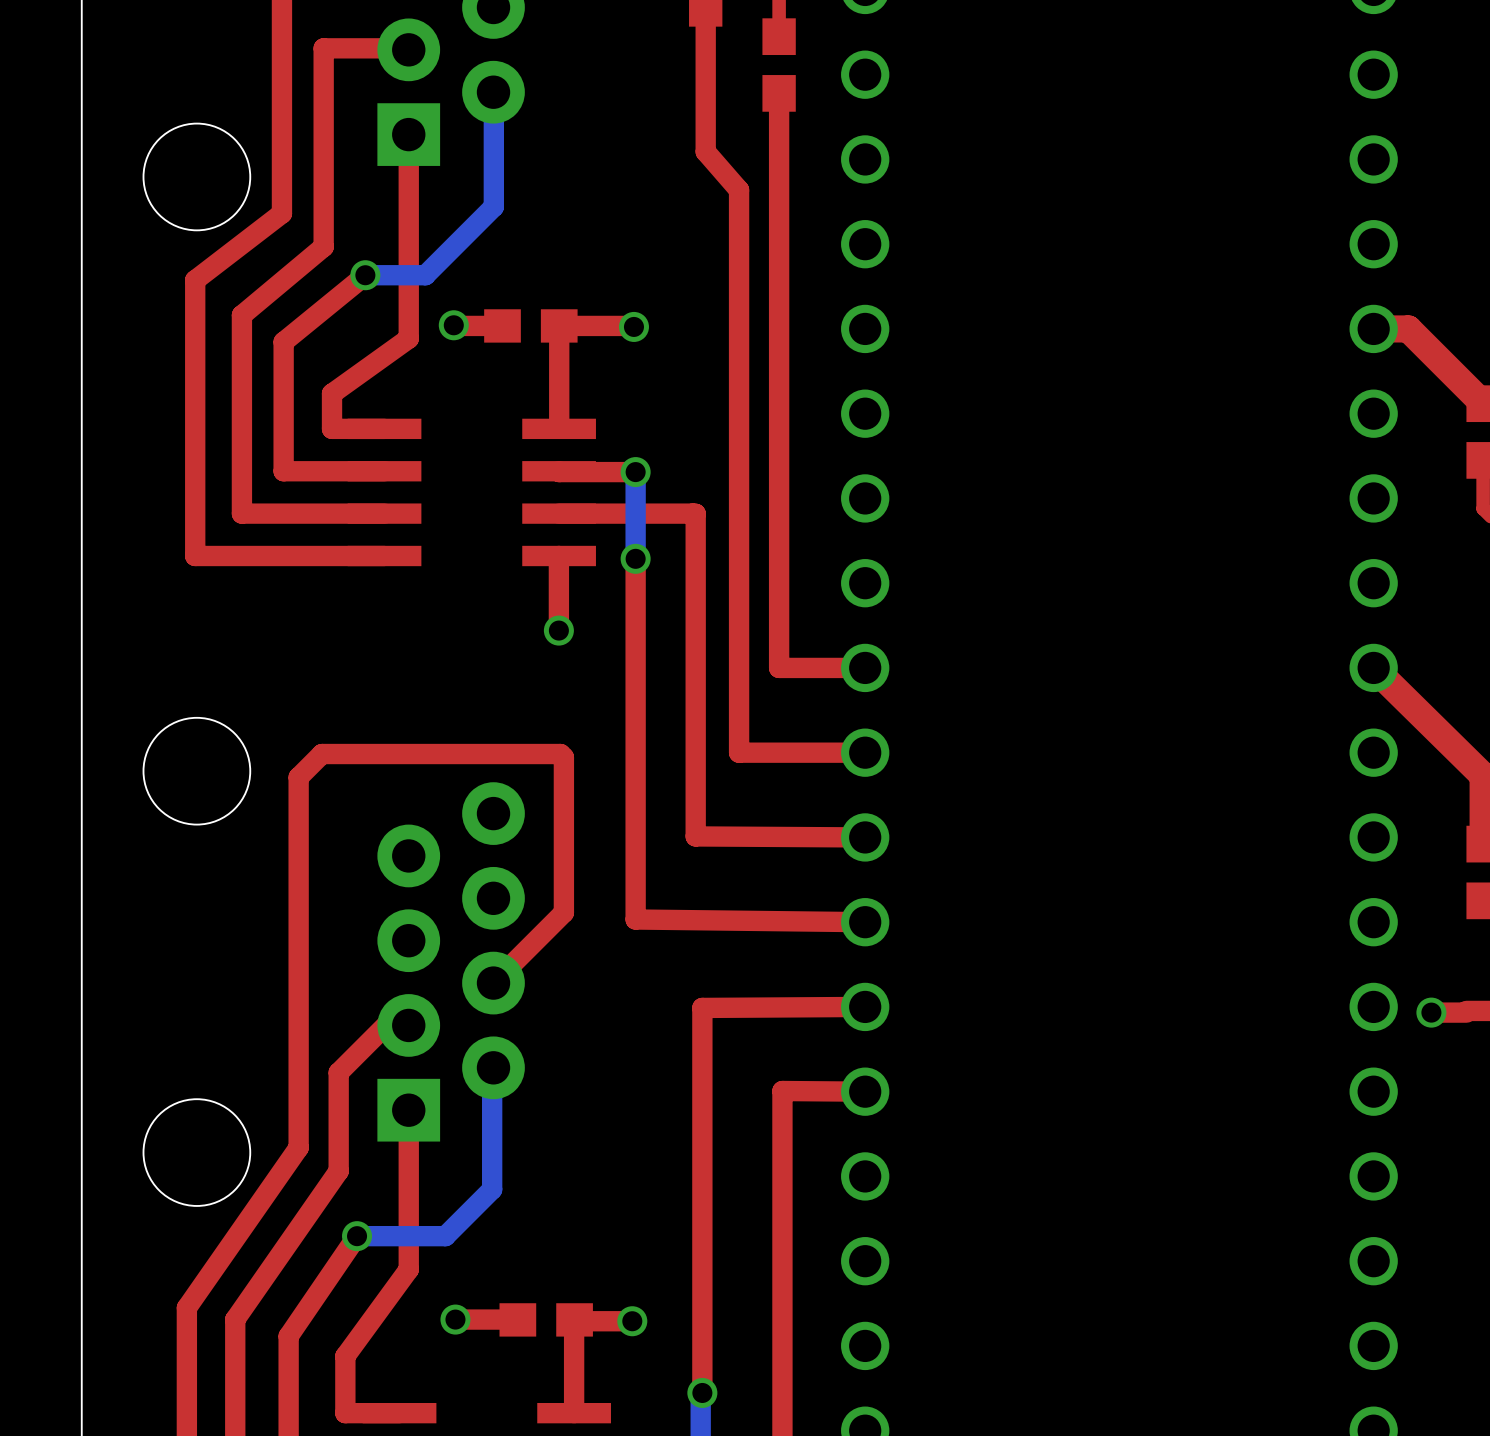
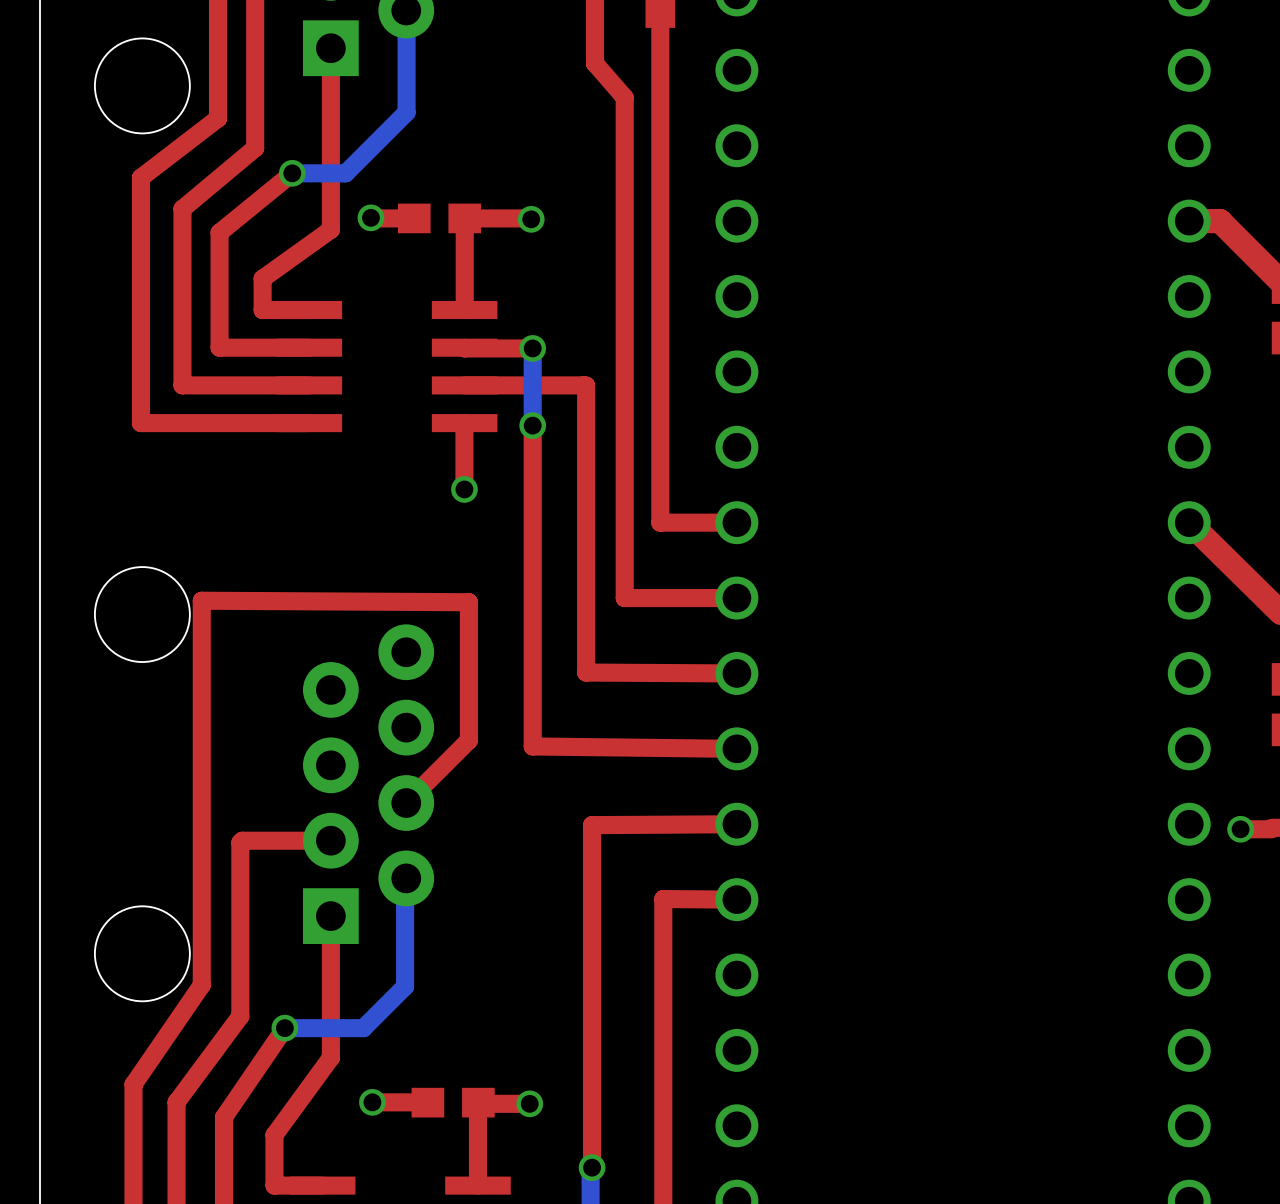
top track: (563, 757) (560, 754) (322, 754) (298, 777) (298, 1147) (186, 1307) -> (468, 602) (201, 600) (201, 985) (133, 1084) (133, 1091)
top track: (408, 1025) (387, 1024) (338, 1072) (338, 1171) (235, 1319) -> (330, 840) (242, 840) (240, 842) (240, 1016) (176, 1102)

